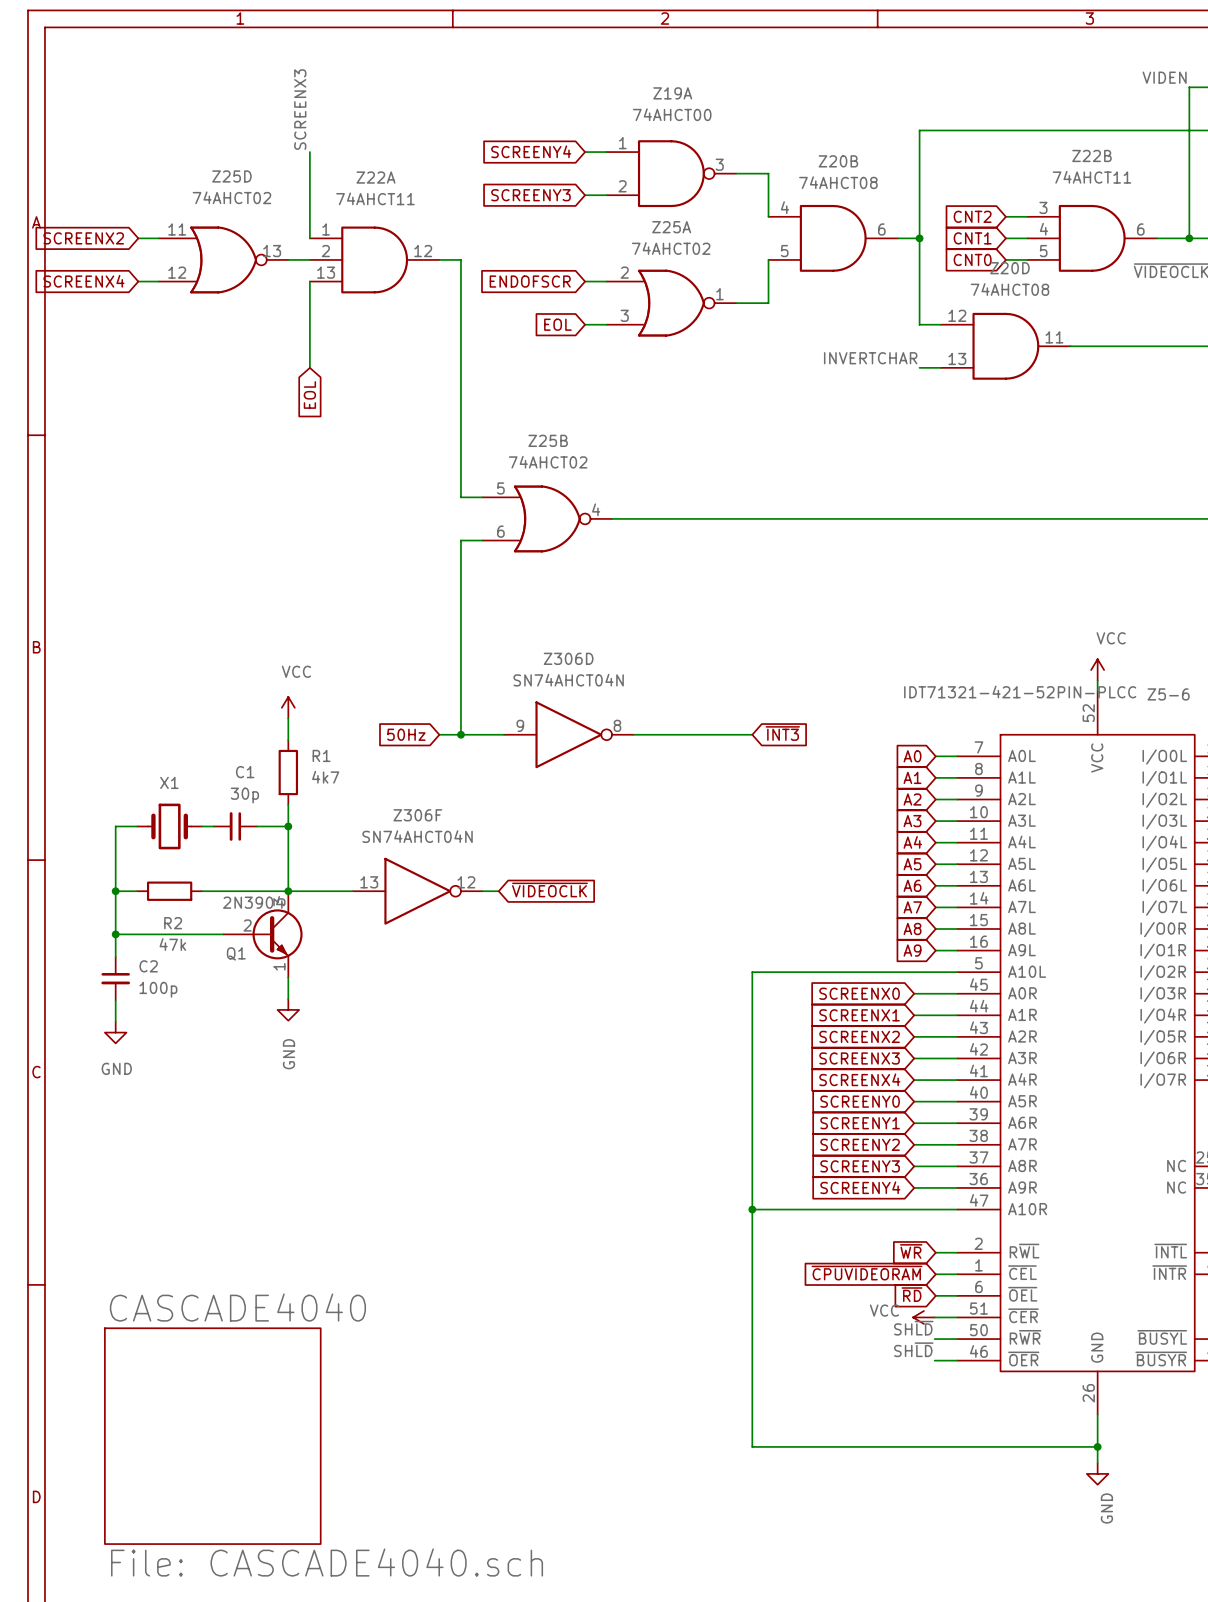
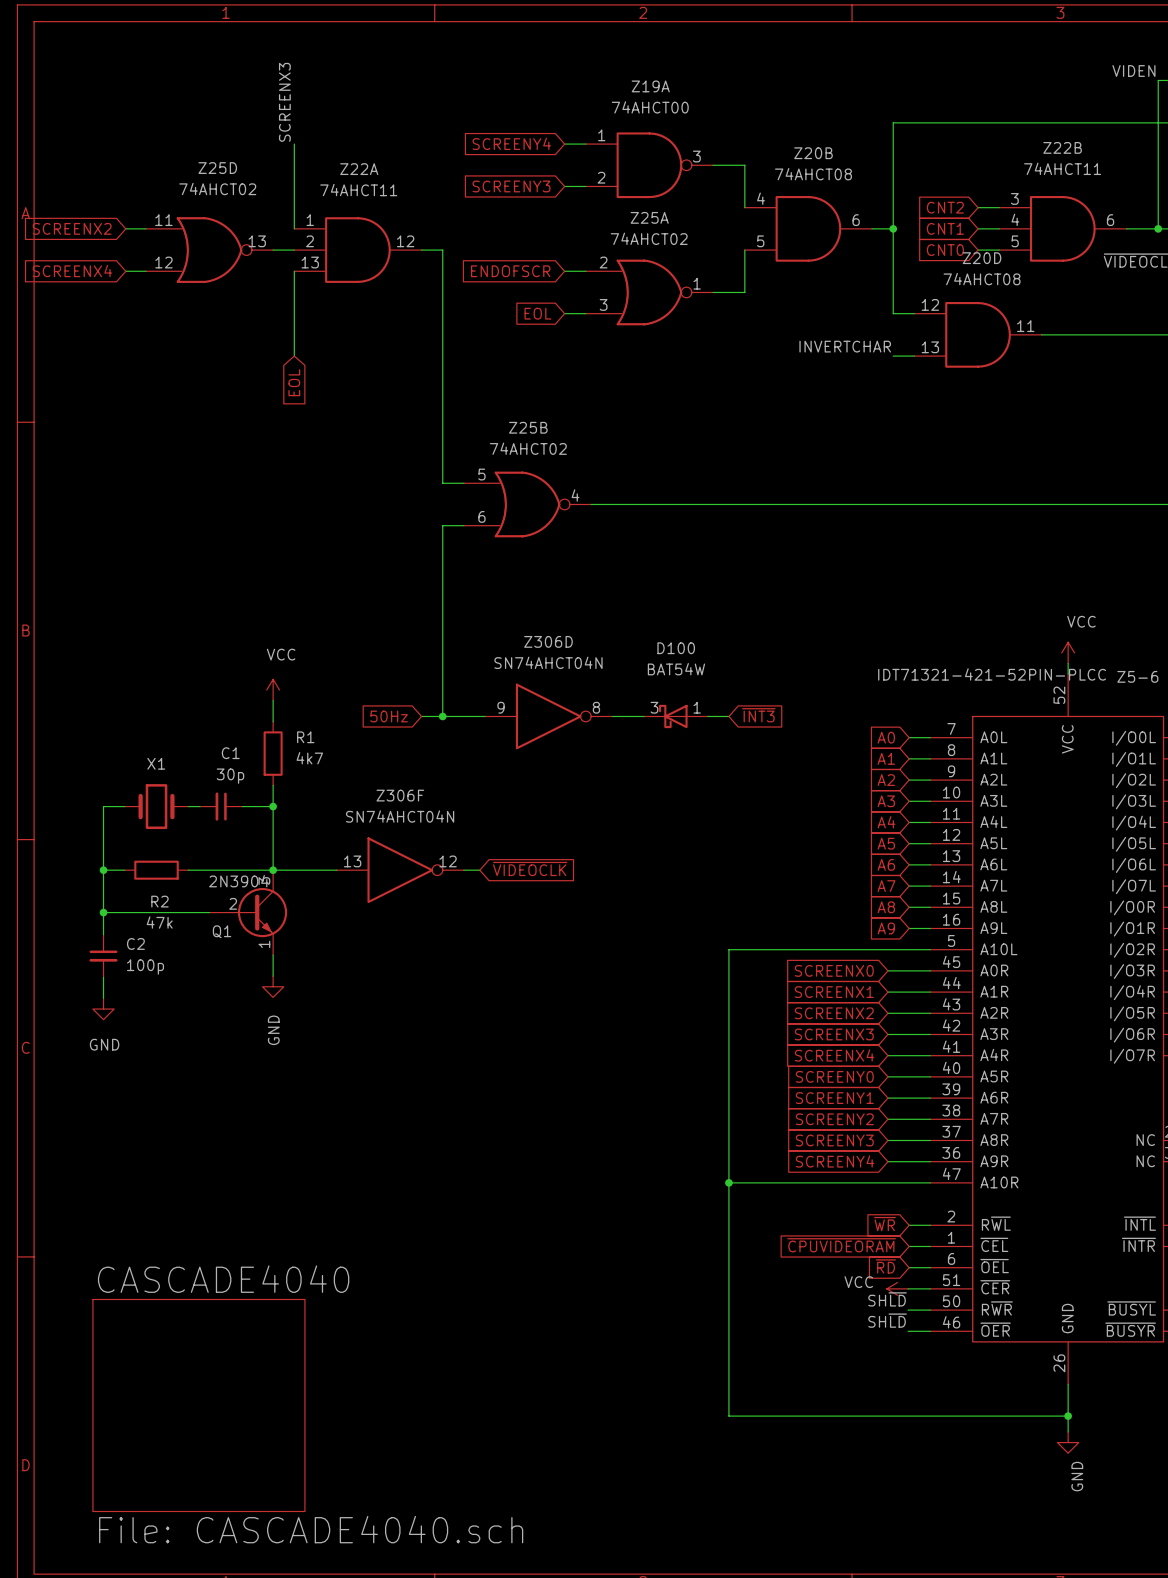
D100: none -> BAT54W (675, 716)

